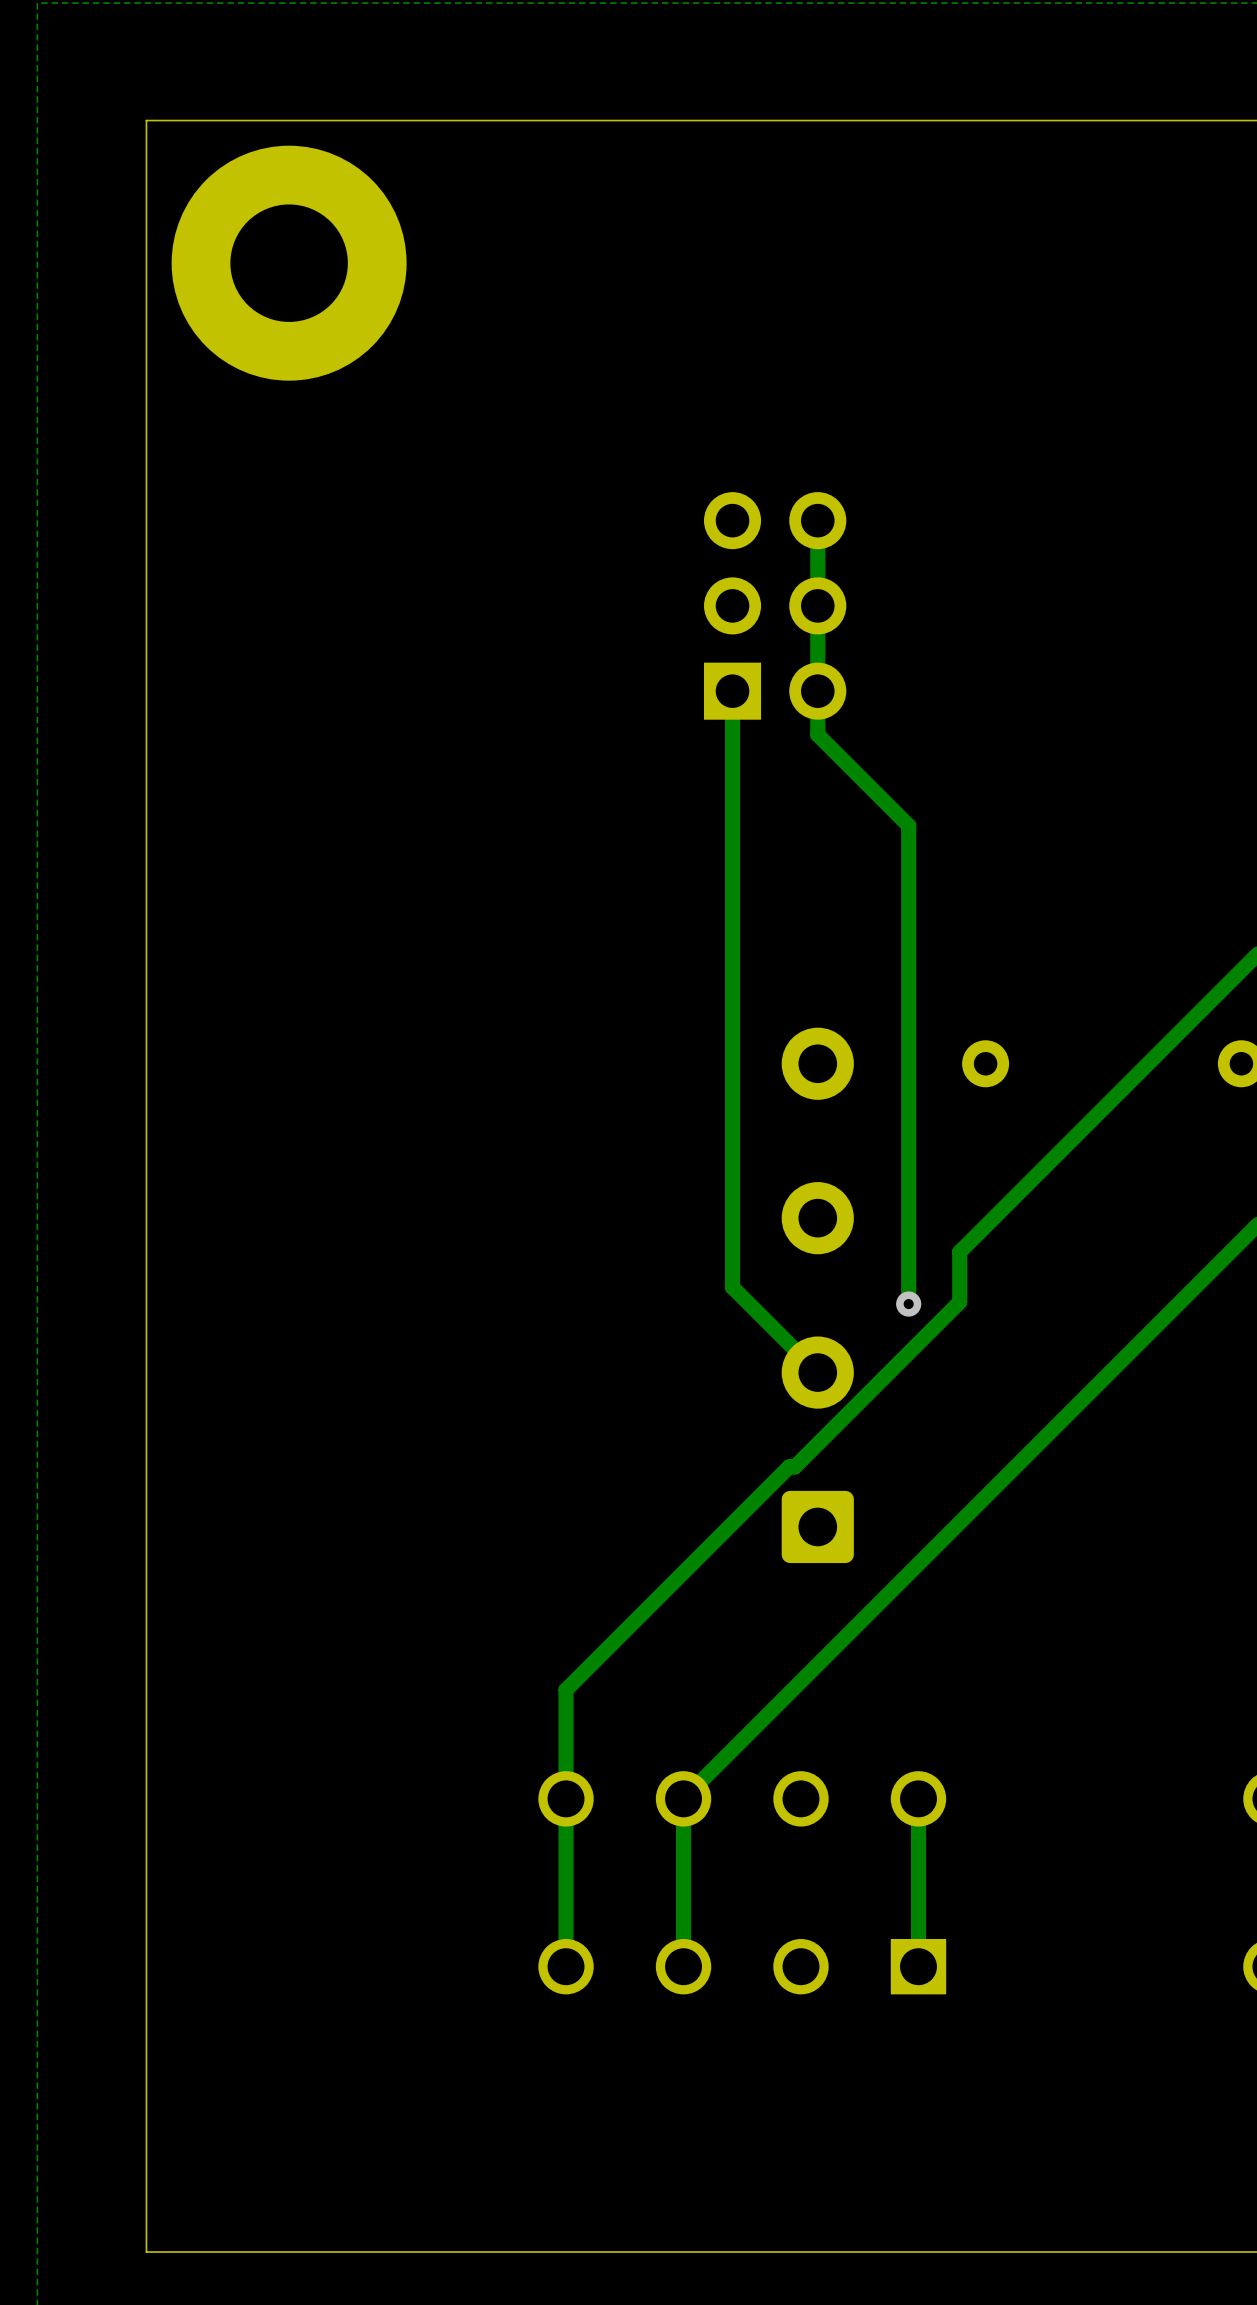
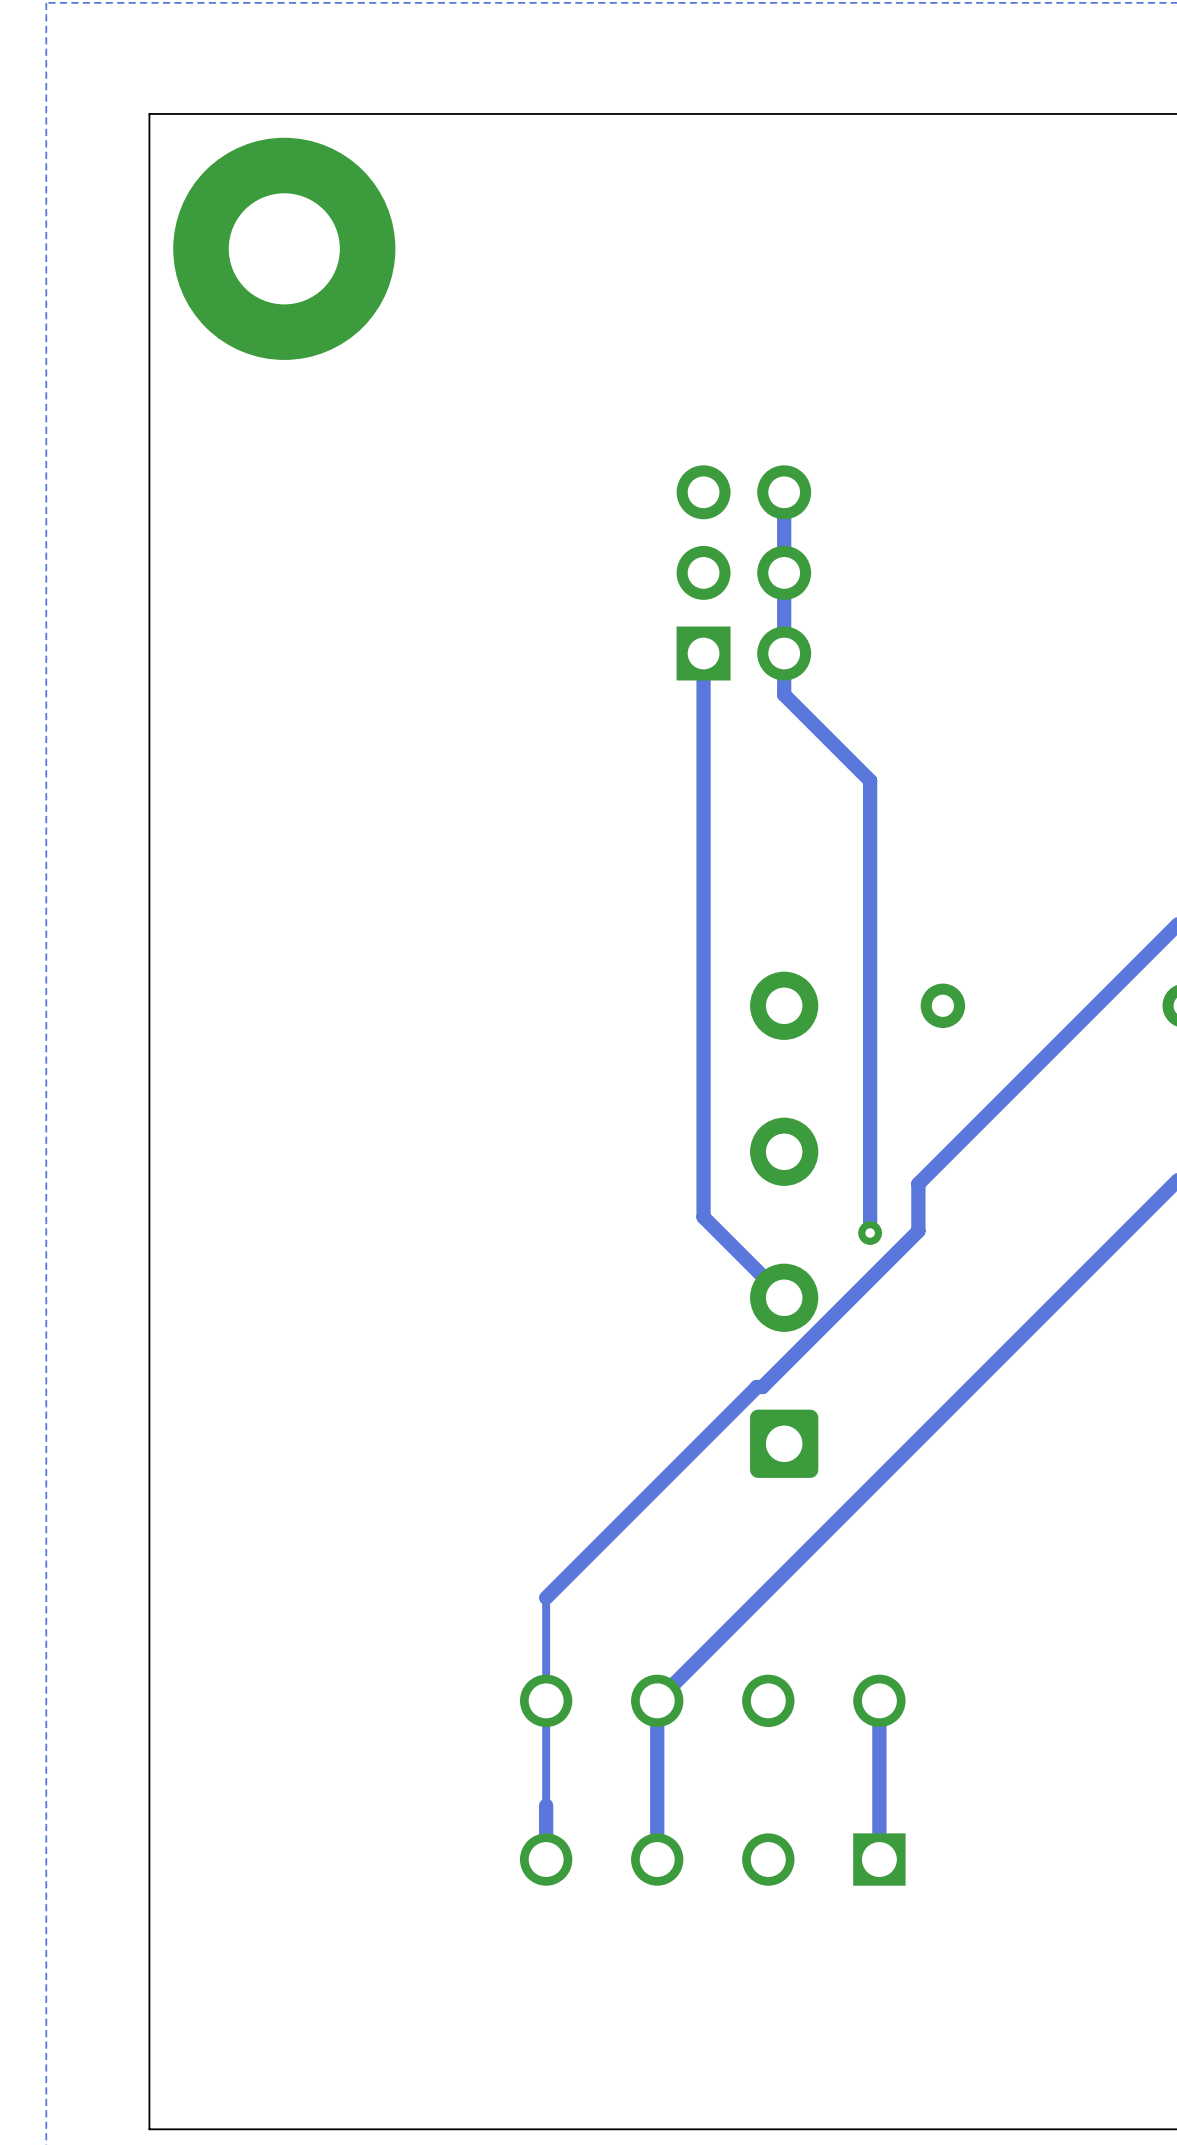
track width: thick (566, 1689) (566, 1909) -> thin (546, 1597) (546, 1805)

